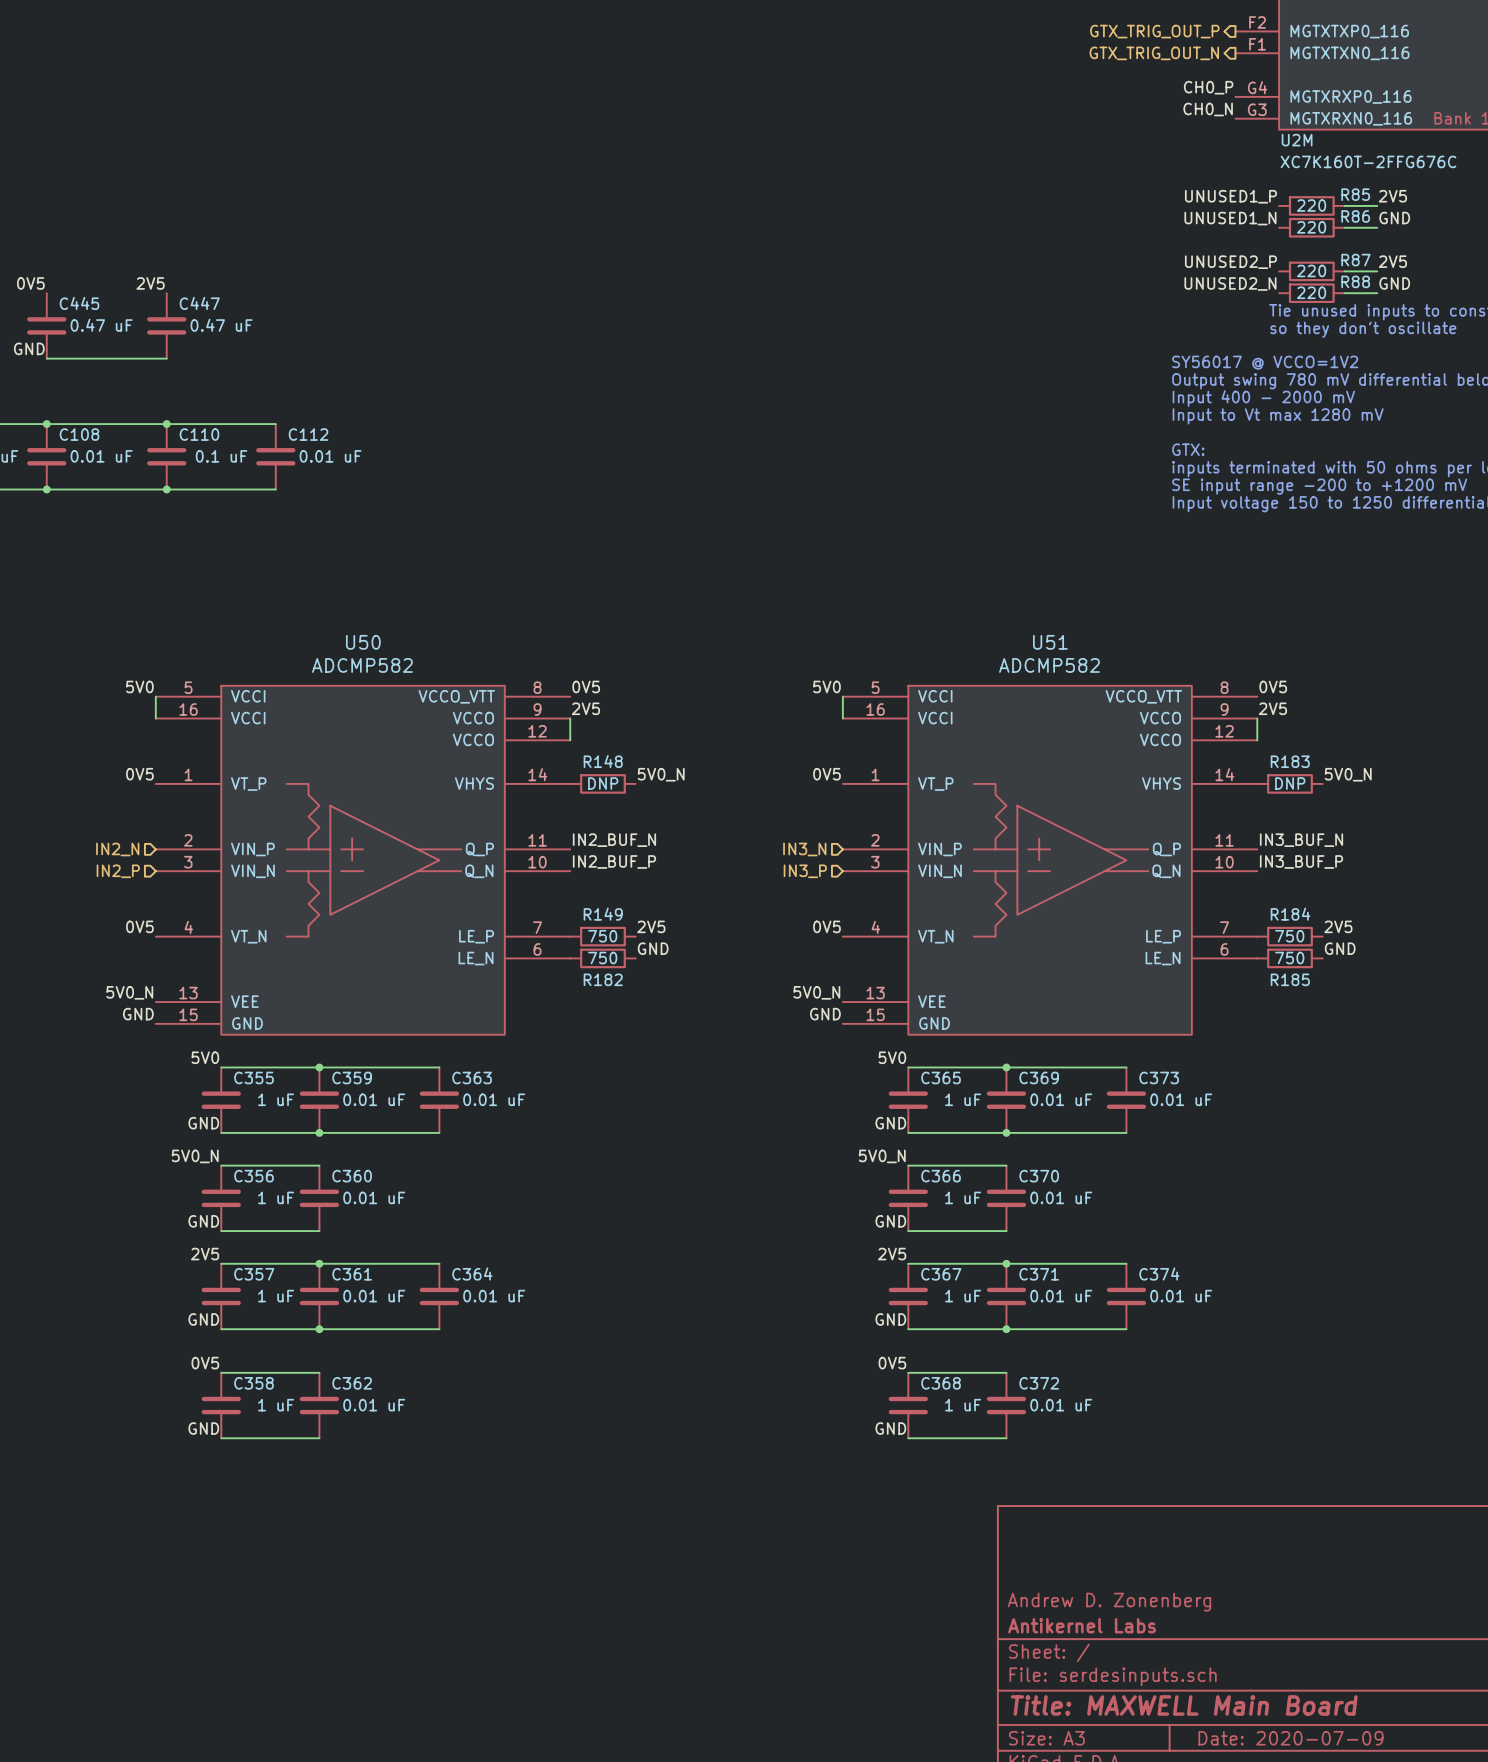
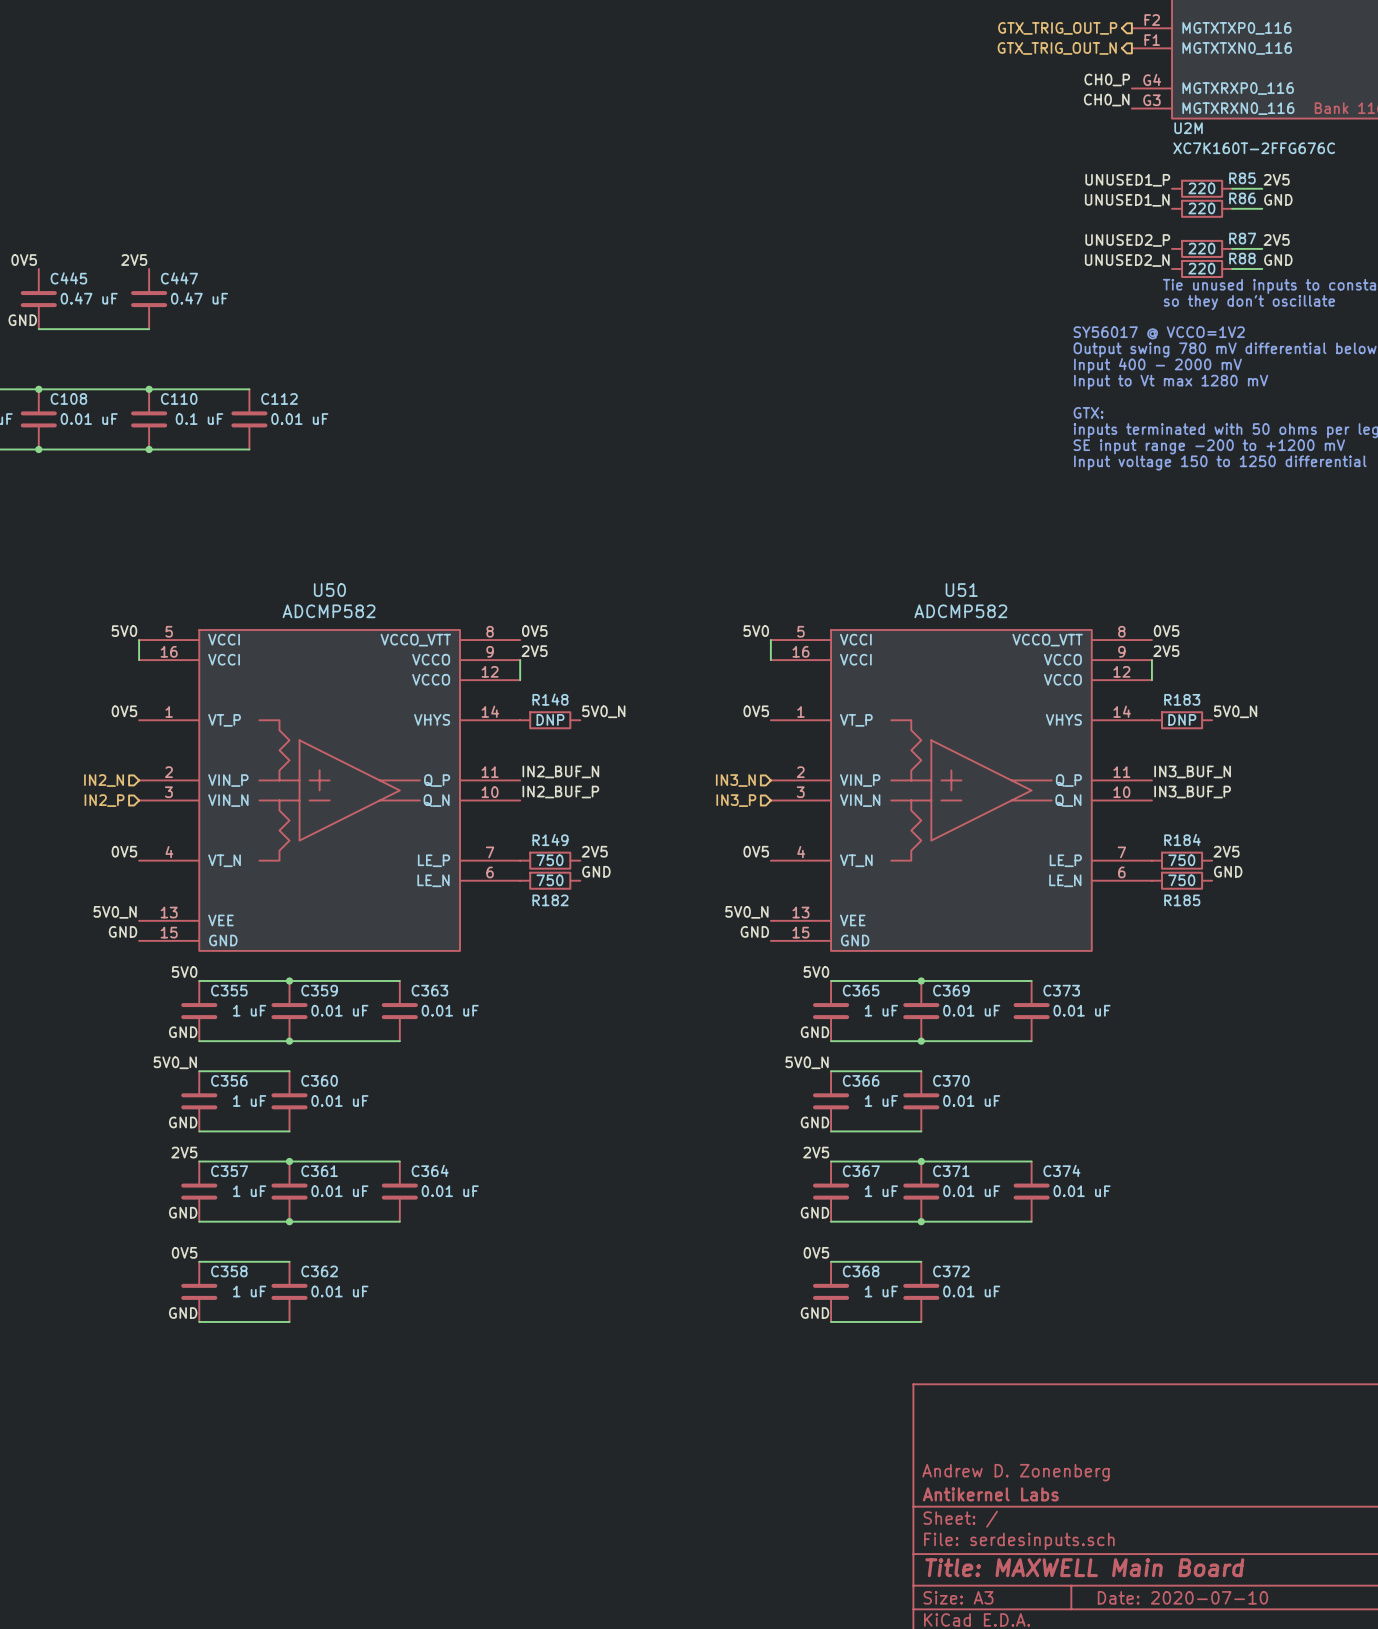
title block: Date: 2020-07-09 (1290, 1738) -> Date: 2020-07-10 (1182, 1597)

